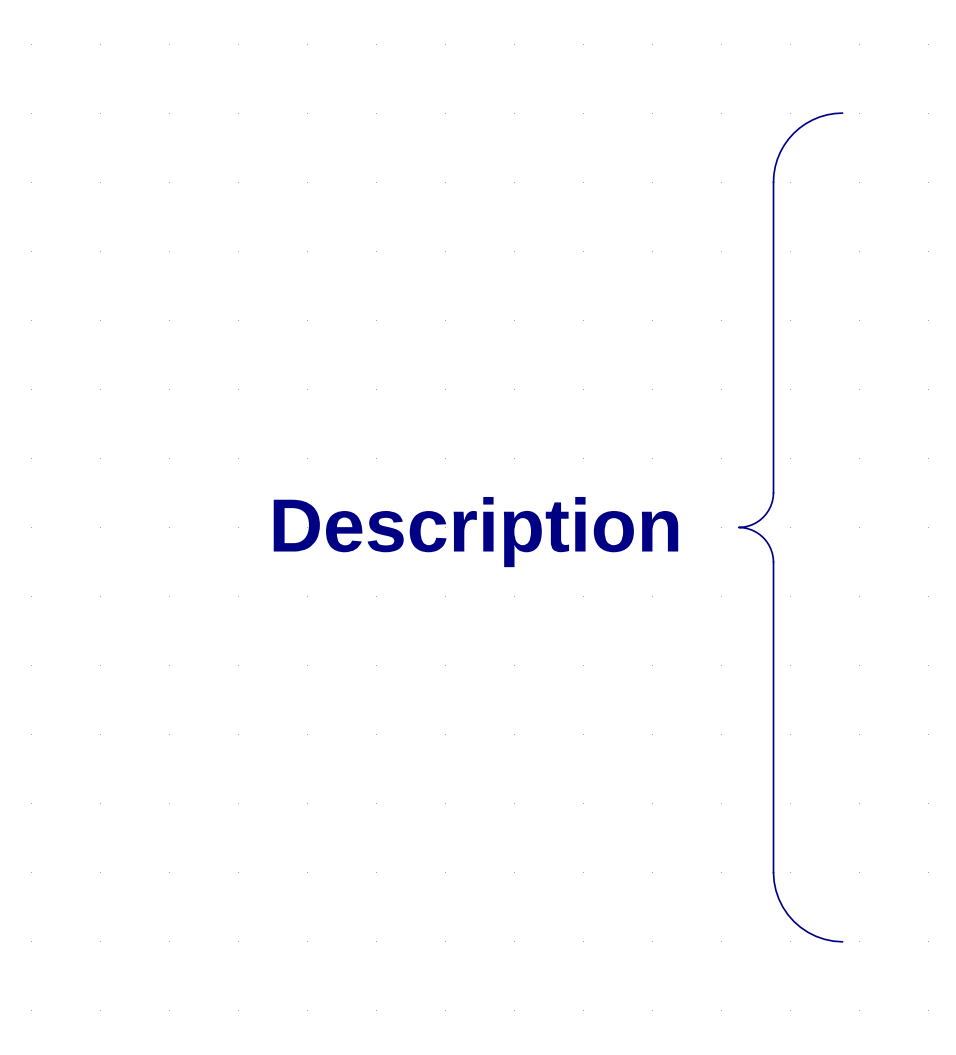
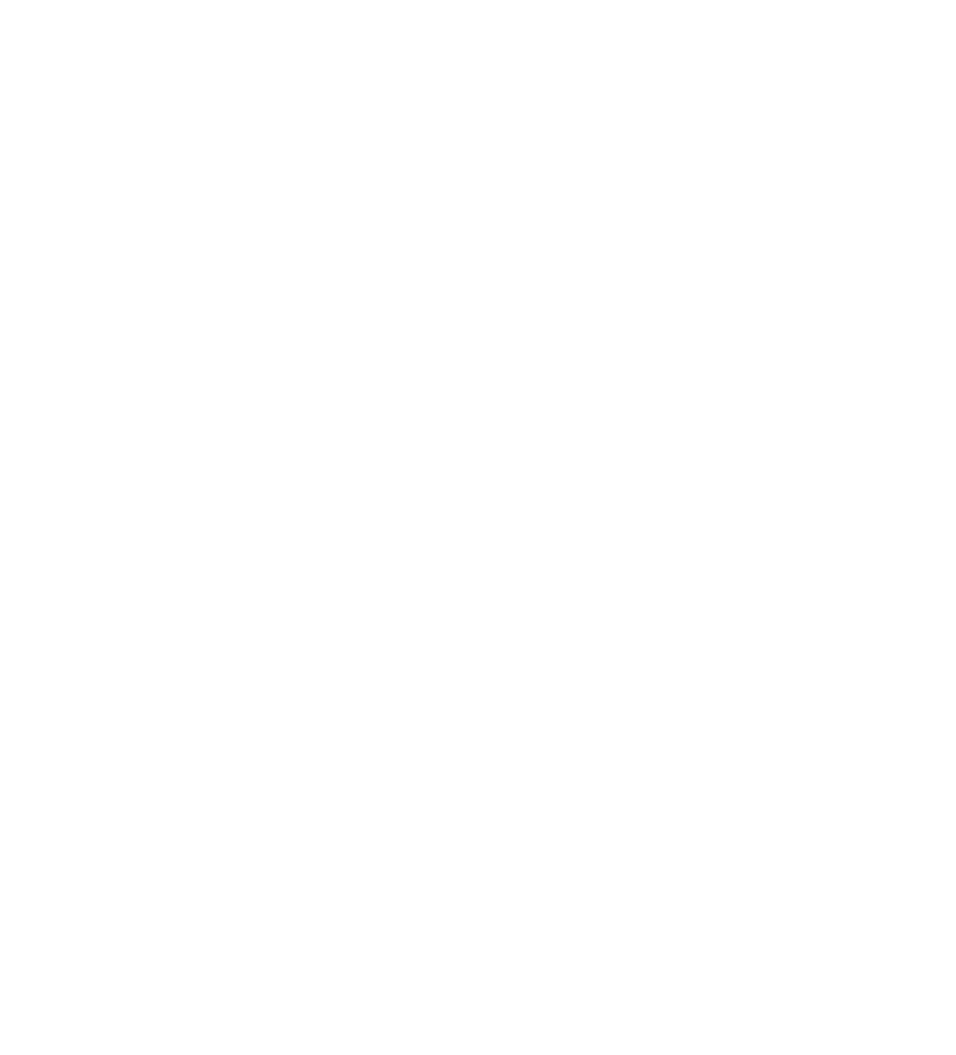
line: (842, 113) (819, 116) (799, 128) (784, 145) (775, 166) (773, 182) (773, 497) (768, 510) (759, 520) (747, 526) (738, 527) (752, 530) (759, 534) (768, 544) (773, 557) (773, 872) (775, 890) (787, 914) (800, 927) (824, 939) (842, 941) -> none
text: Description (475, 532) -> none

